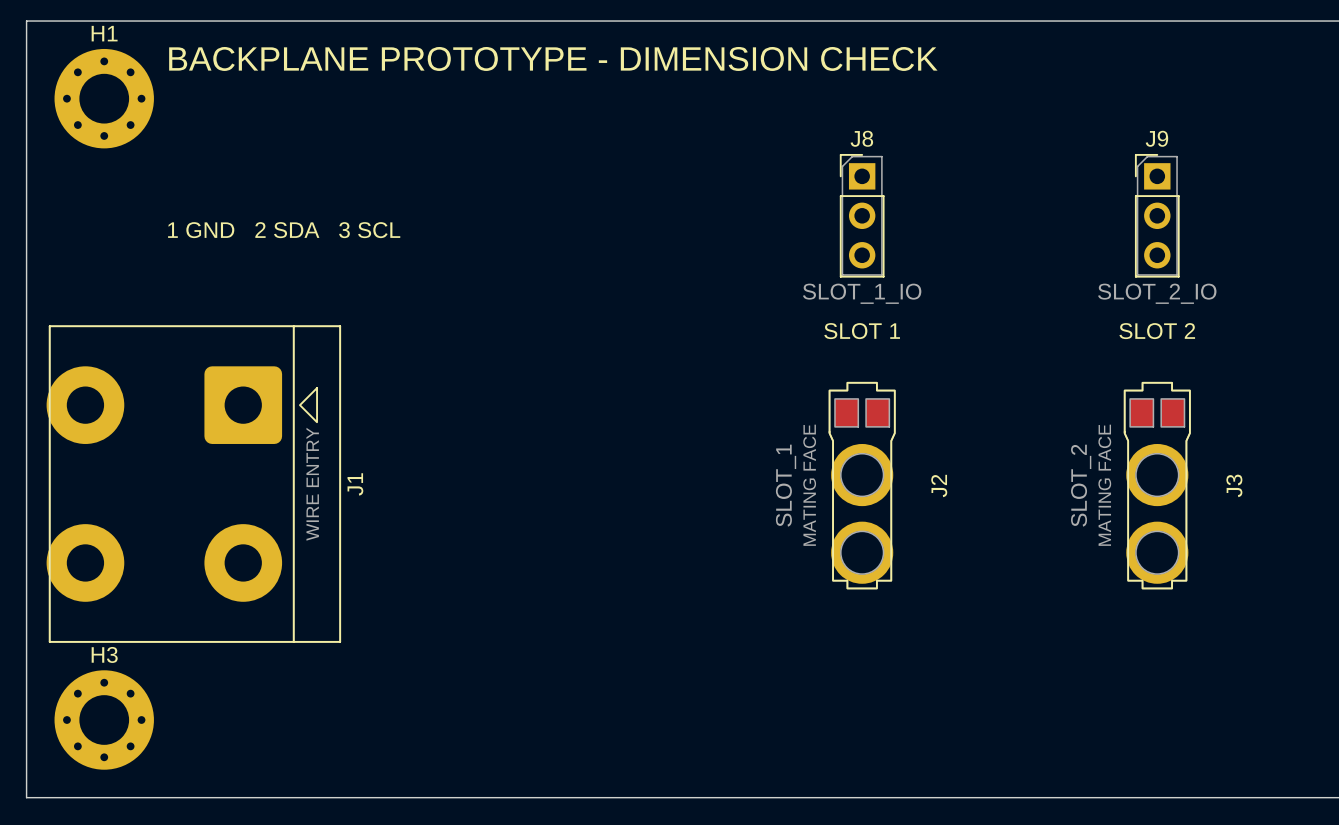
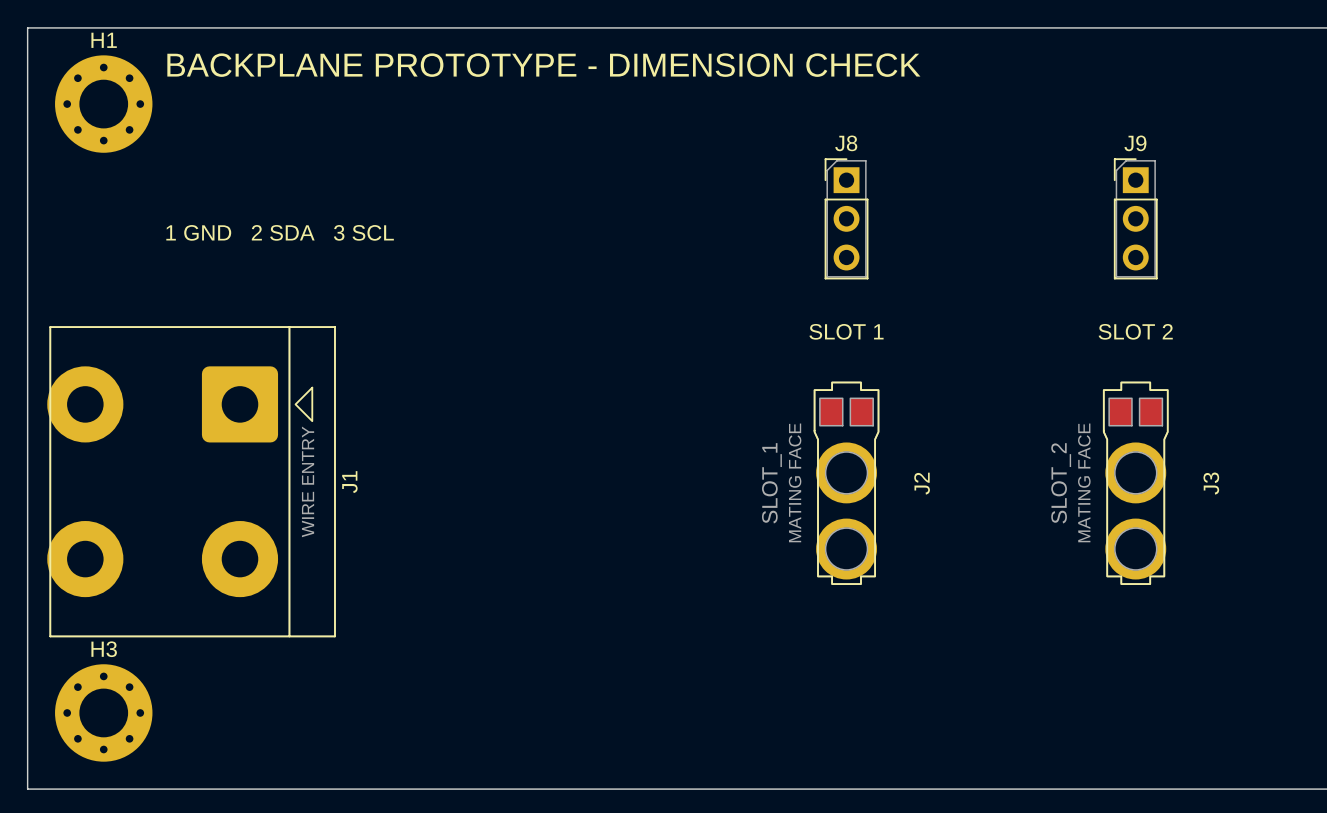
J8 value: SLOT_1_IO (862, 293) -> none
J9 value: SLOT_2_IO (1157, 293) -> none

